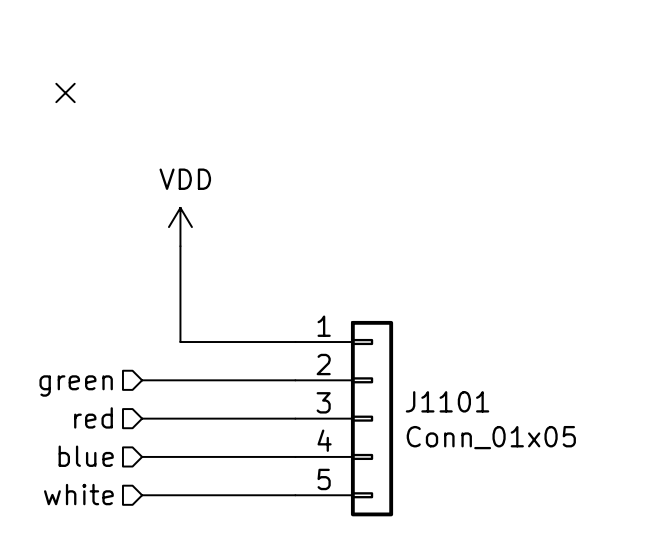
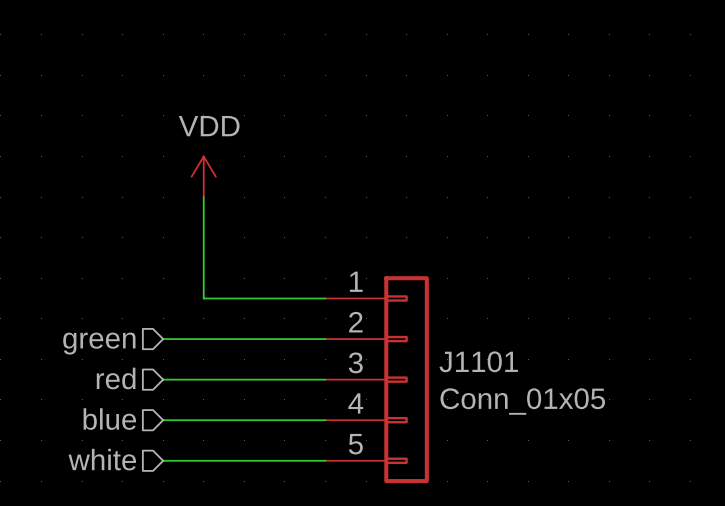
no-connect mark: (65, 92) -> none

